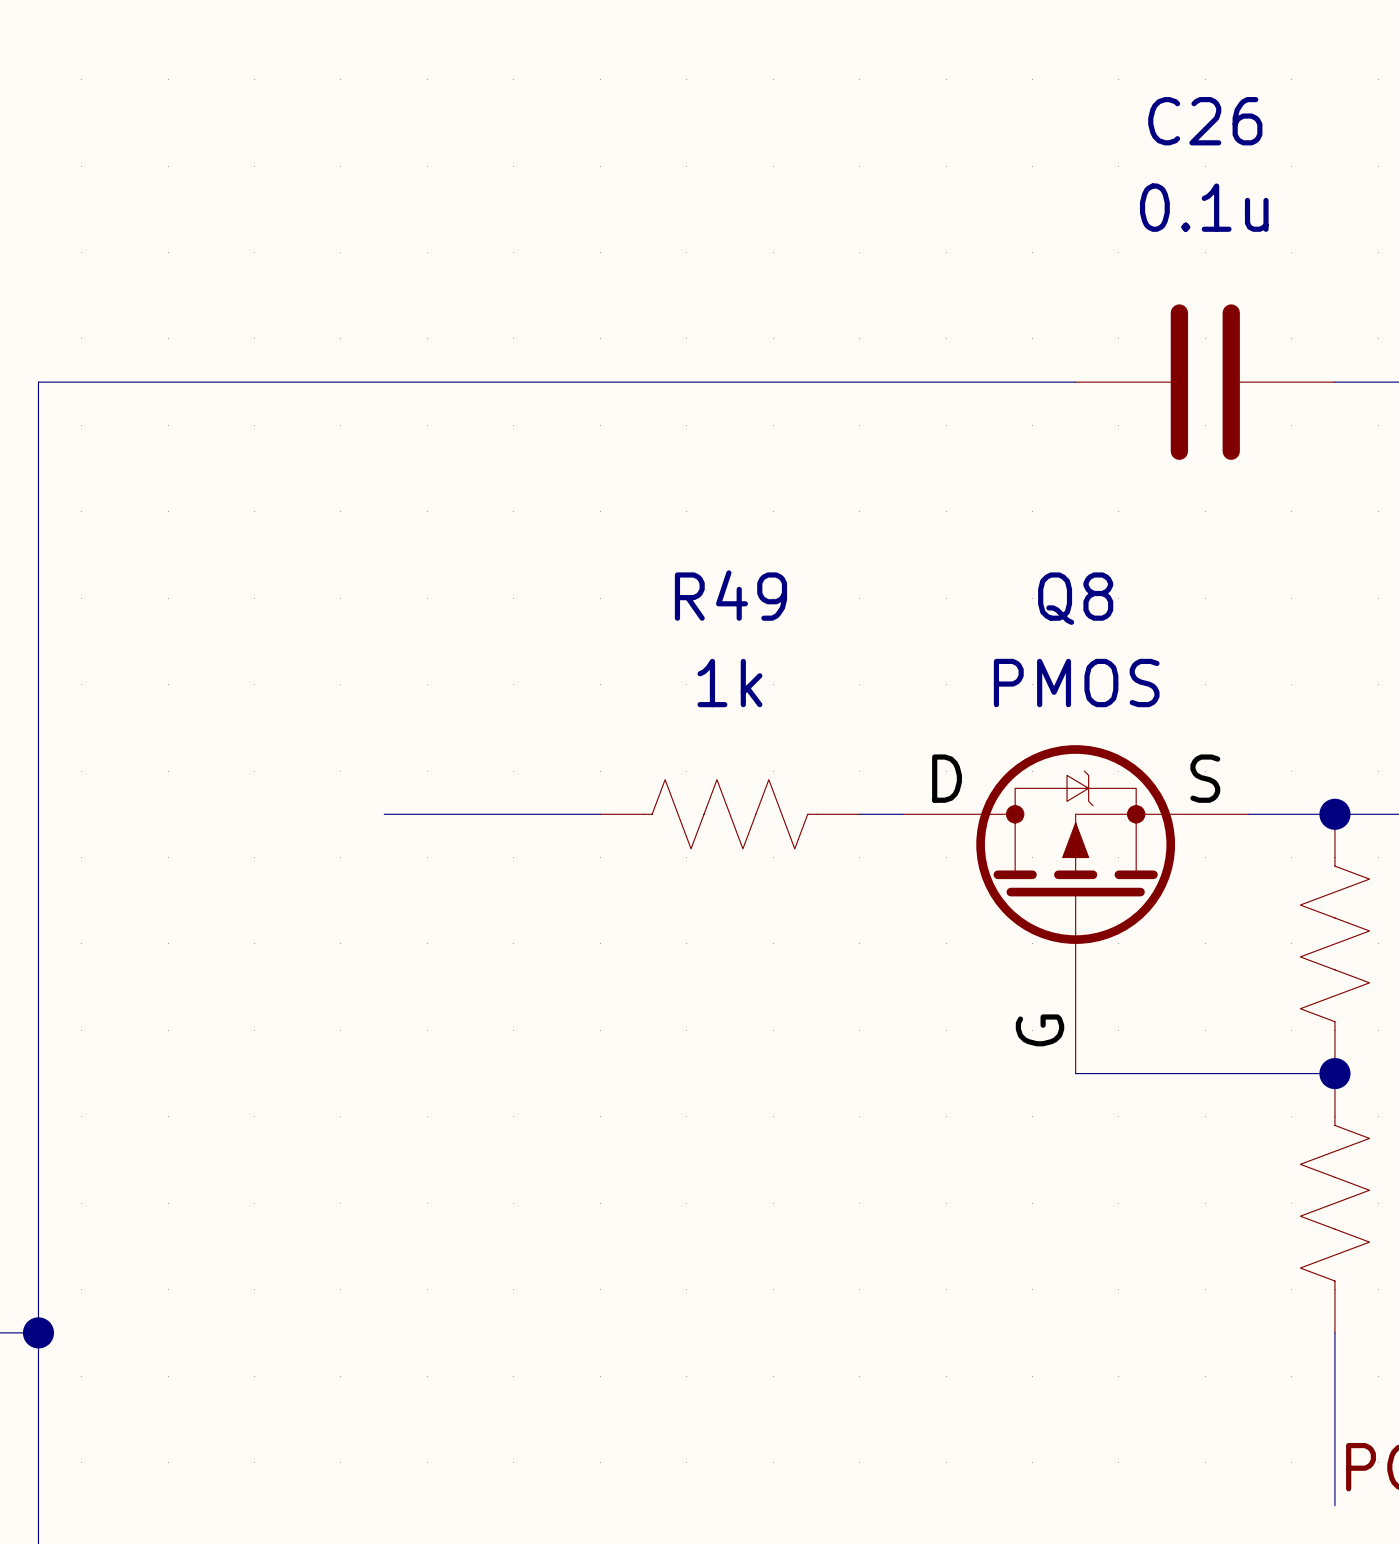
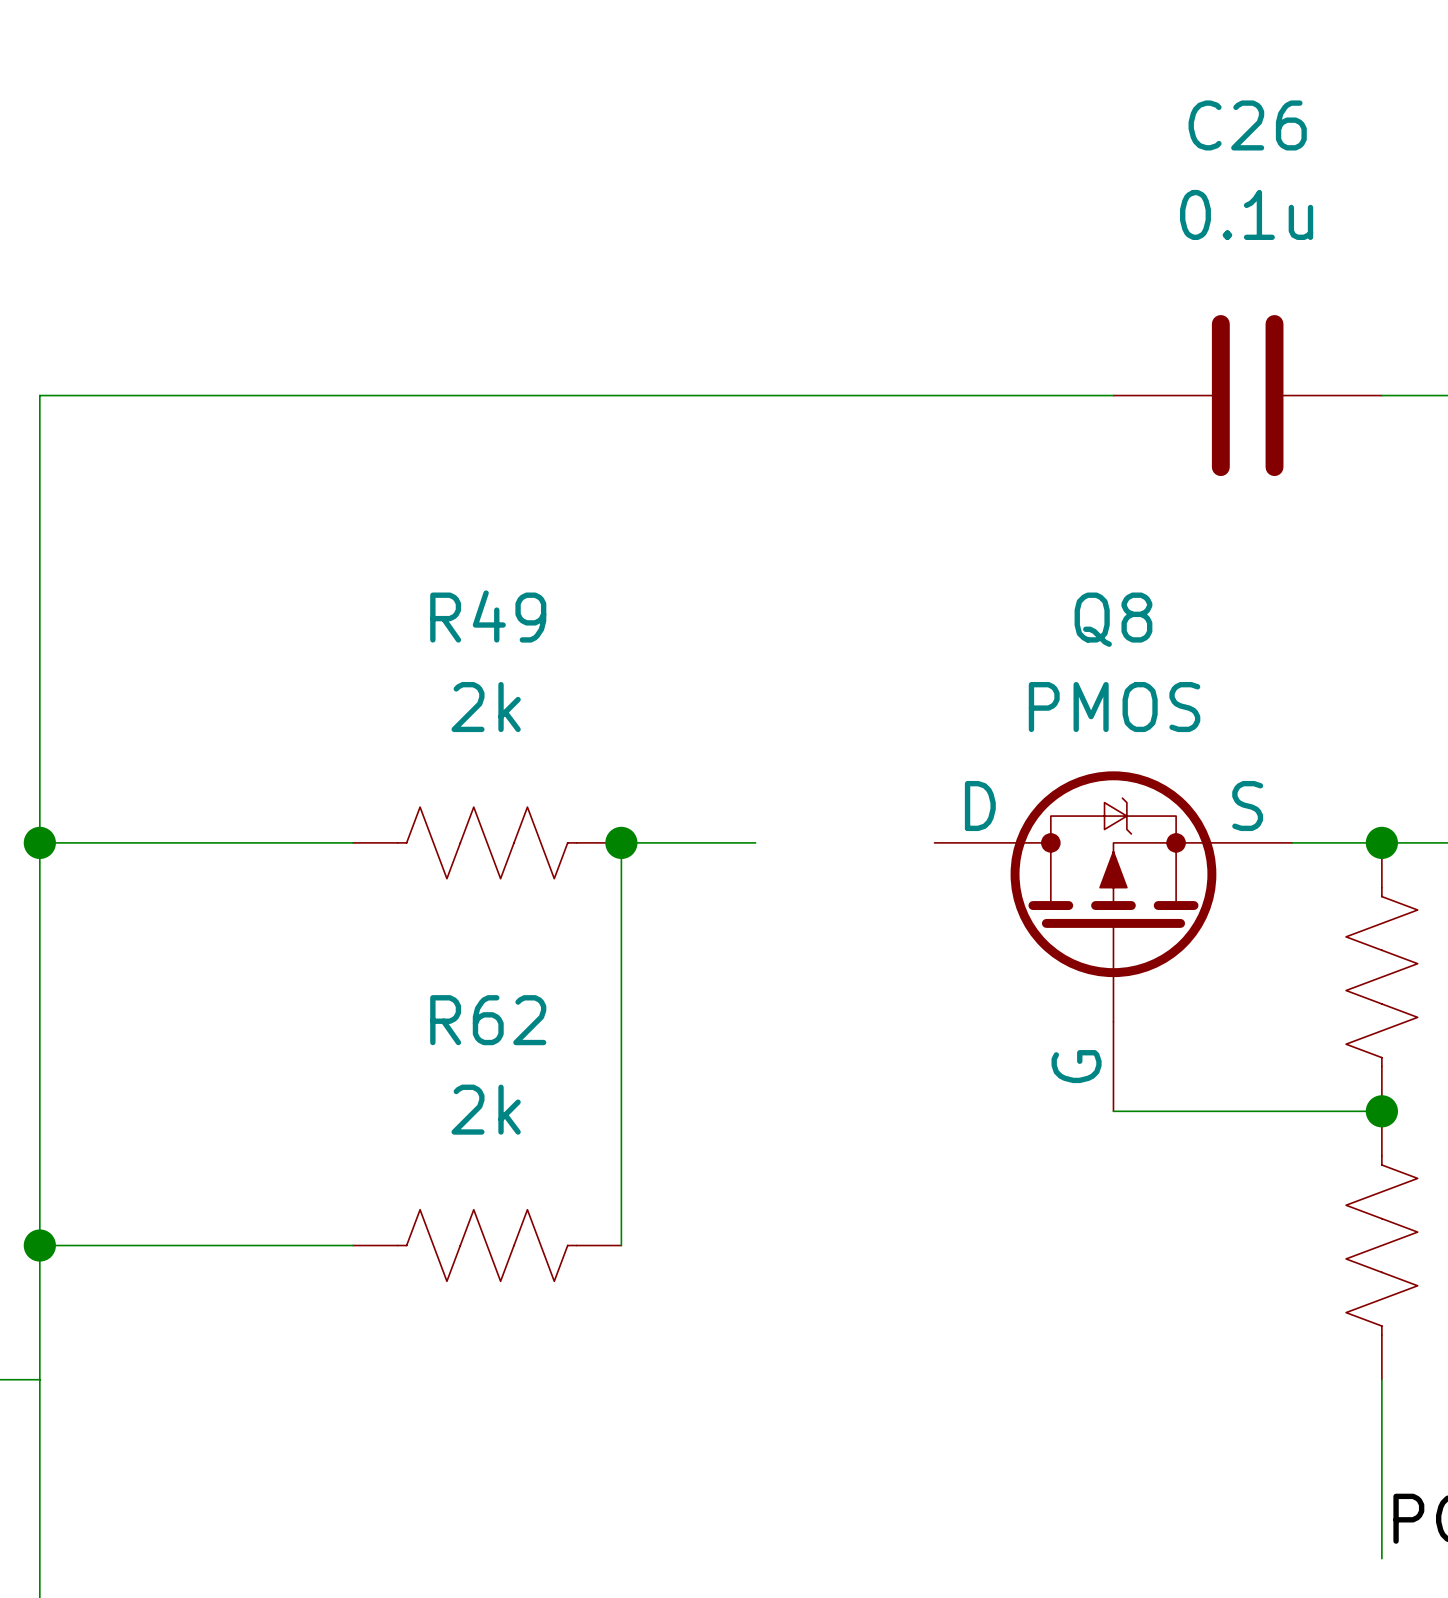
R49 value: 1k (729, 683) -> 2k (486, 707)
wire: none -> (39, 842) (352, 842)
junction: none -> (39, 842)
wire: (384, 814) (600, 814) -> none
junction: none -> (621, 842)
wire: none -> (755, 842) (621, 842) (621, 1245)
R49 position: (729, 814) -> (487, 842)
wire: (859, 814) (902, 814) -> none
wire: none -> (39, 1245) (352, 1245)
R62: none -> 2k (487, 1245)
junction position: (38, 1332) -> (39, 1245)

